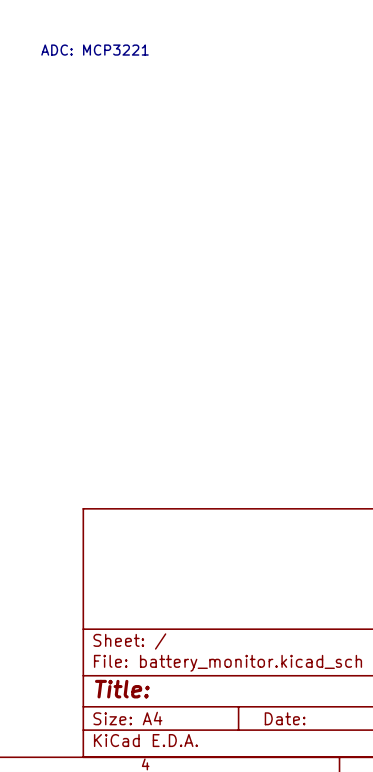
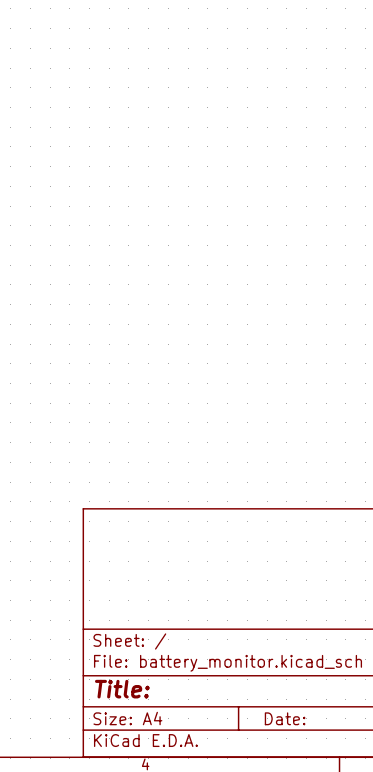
text: ADC: MCP3221 (95, 50) -> none

